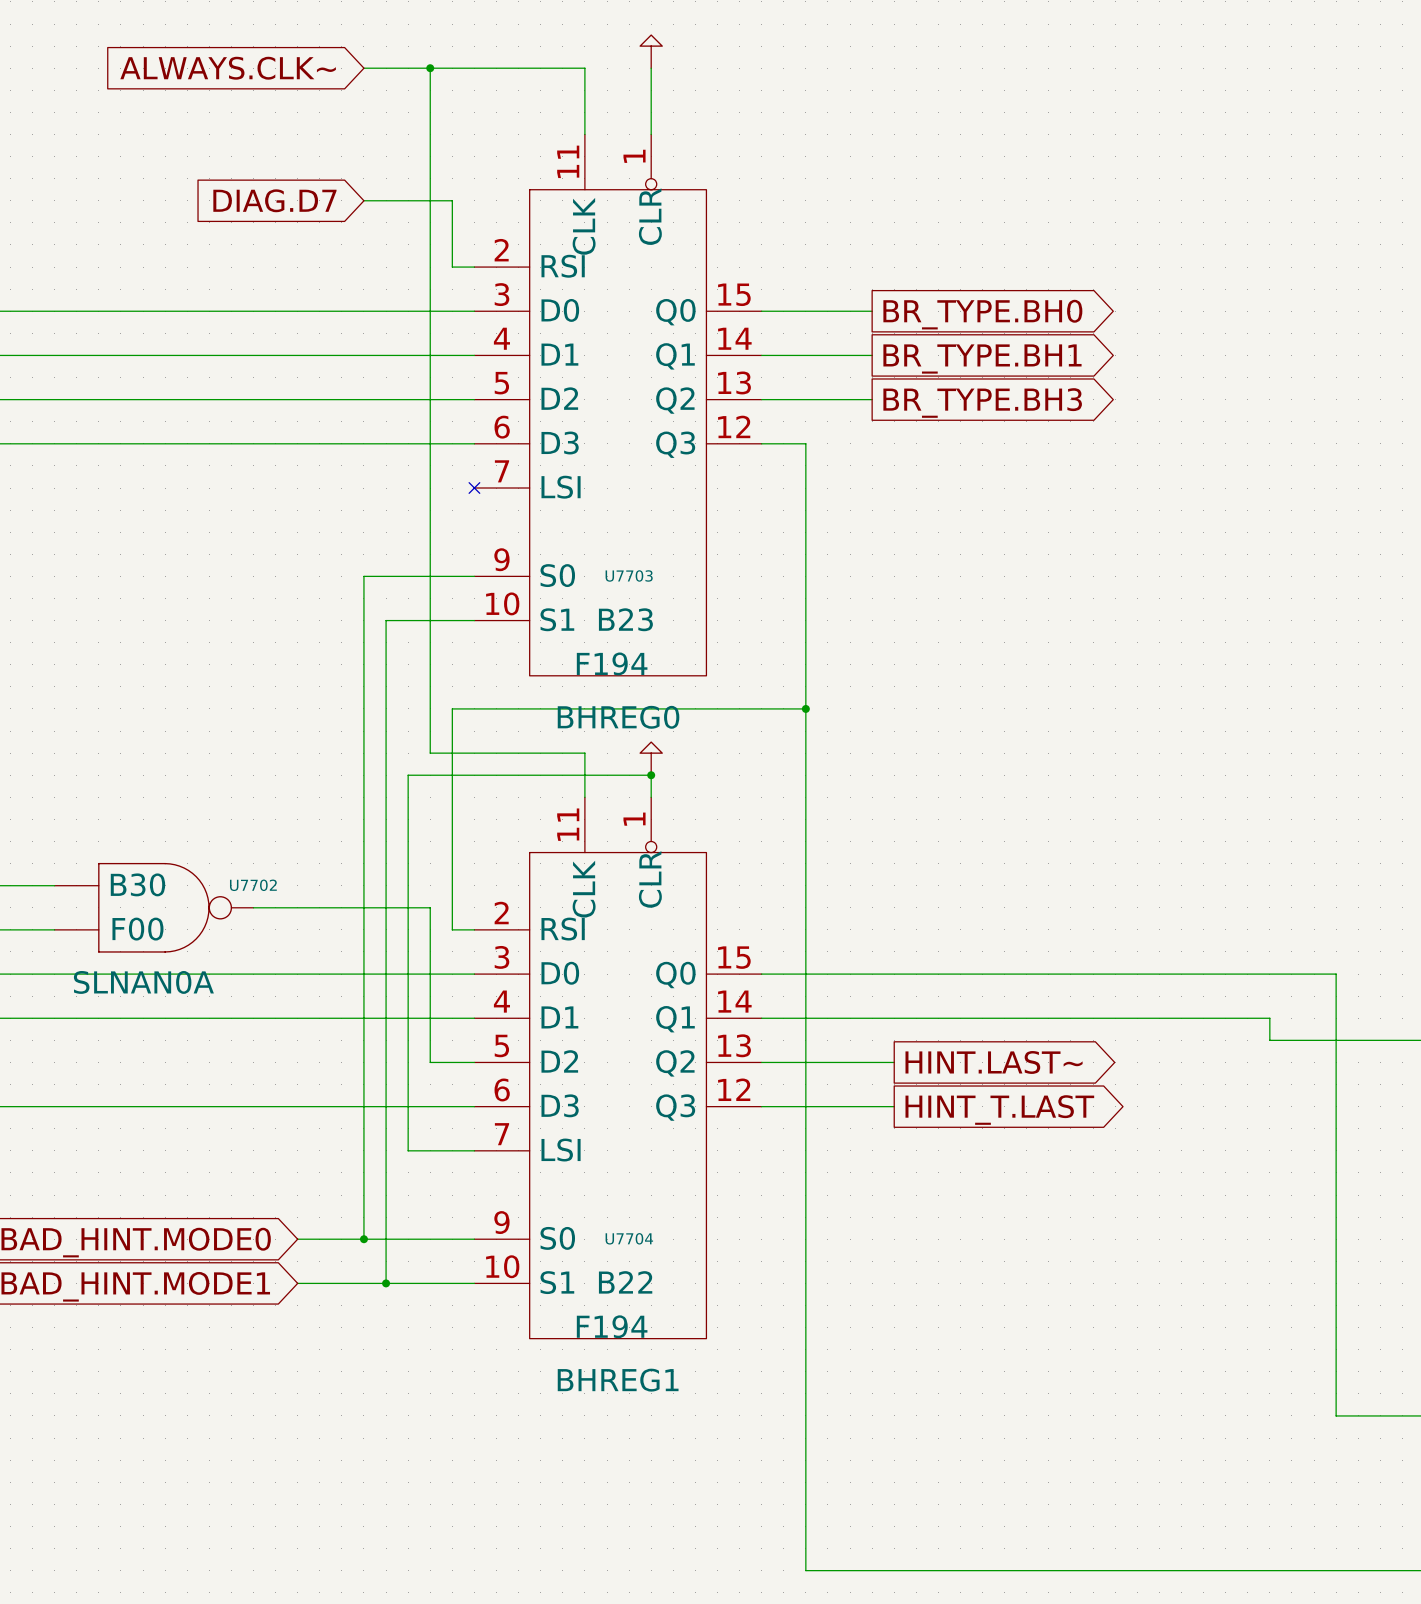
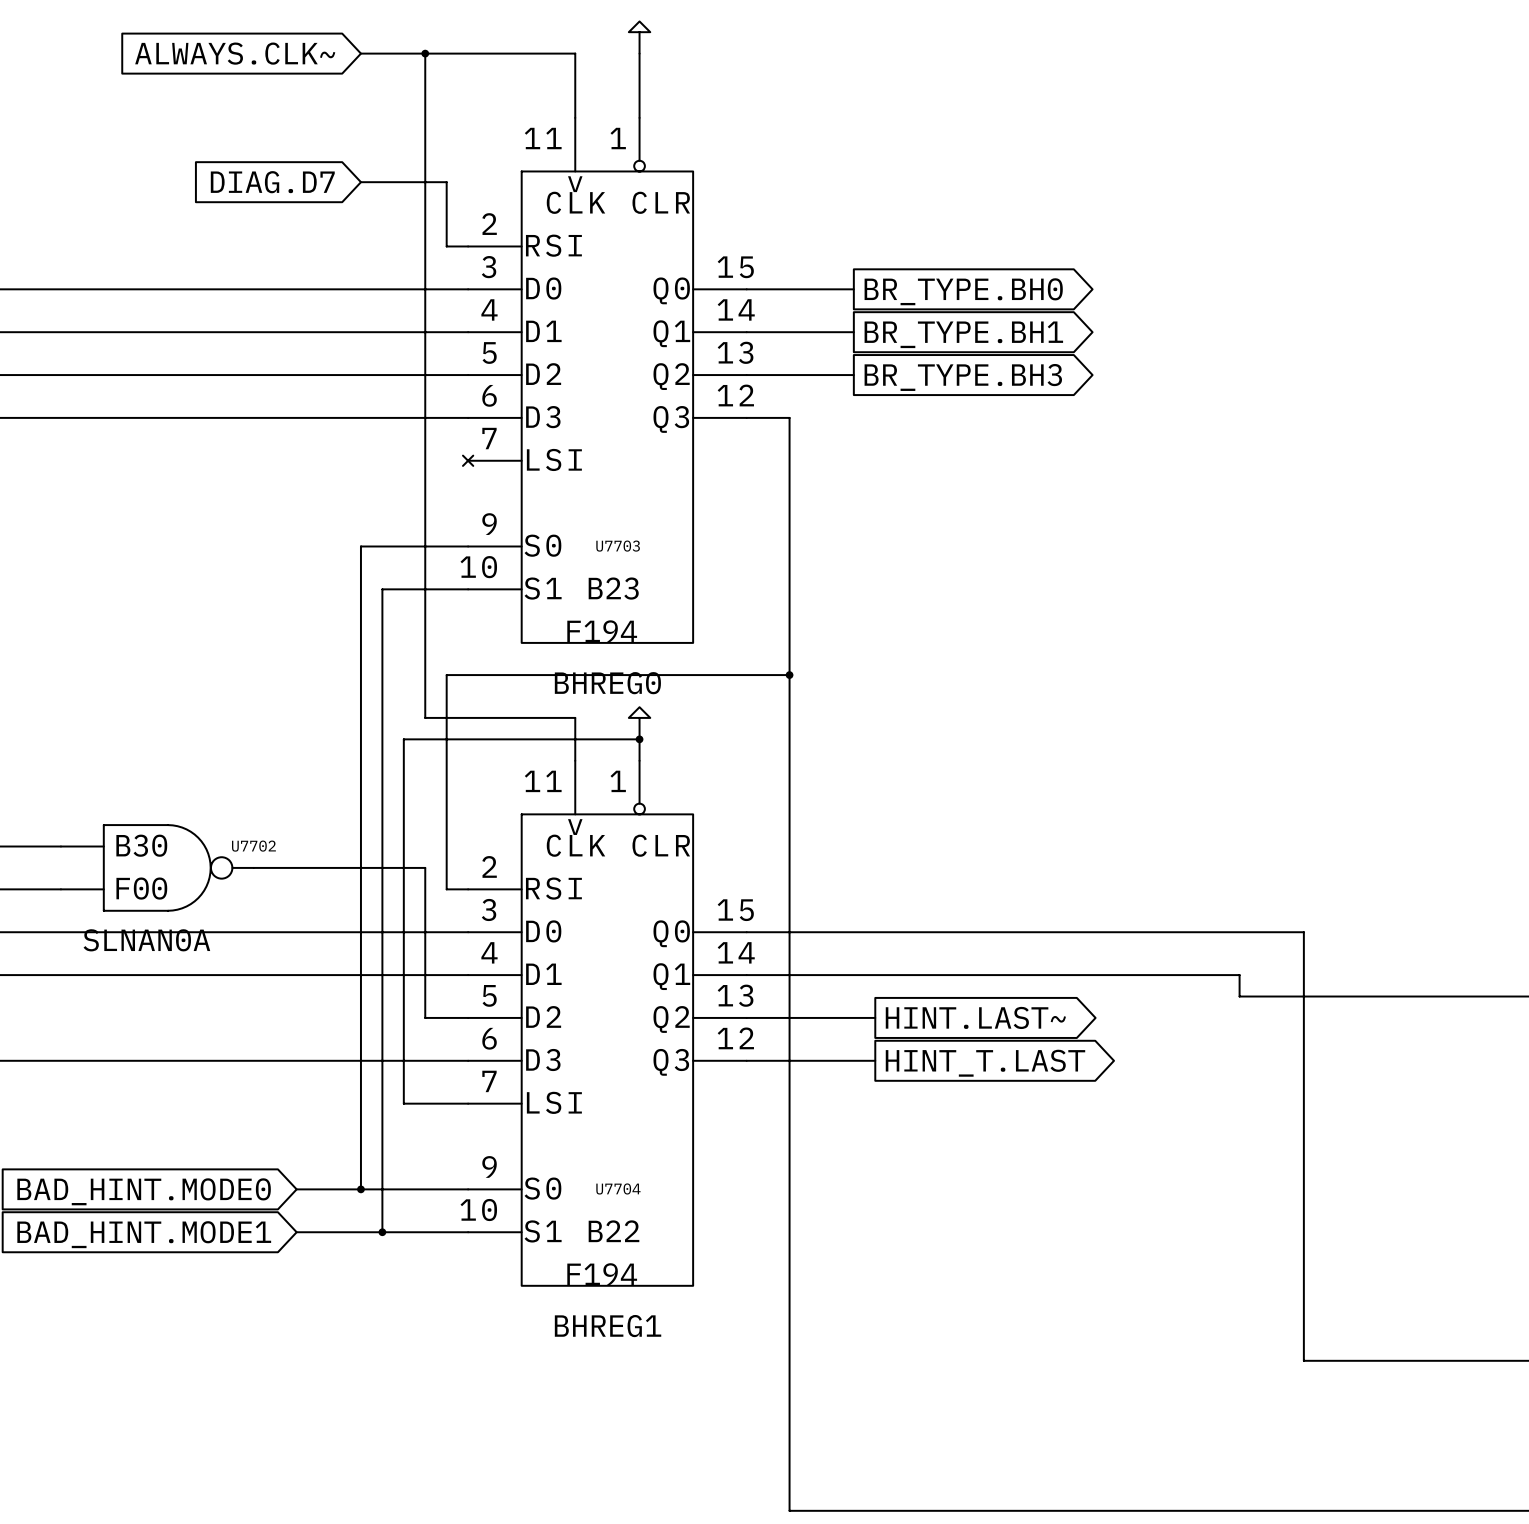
U7703 symbol: [474, 134, 762, 676] -> [468, 117, 747, 643]
U7704 symbol: [474, 797, 762, 1339] -> [468, 760, 747, 1286]

